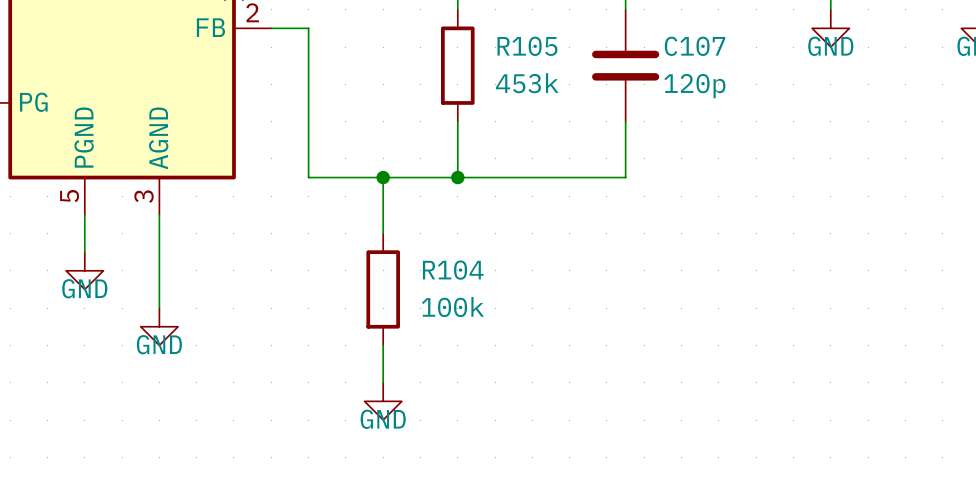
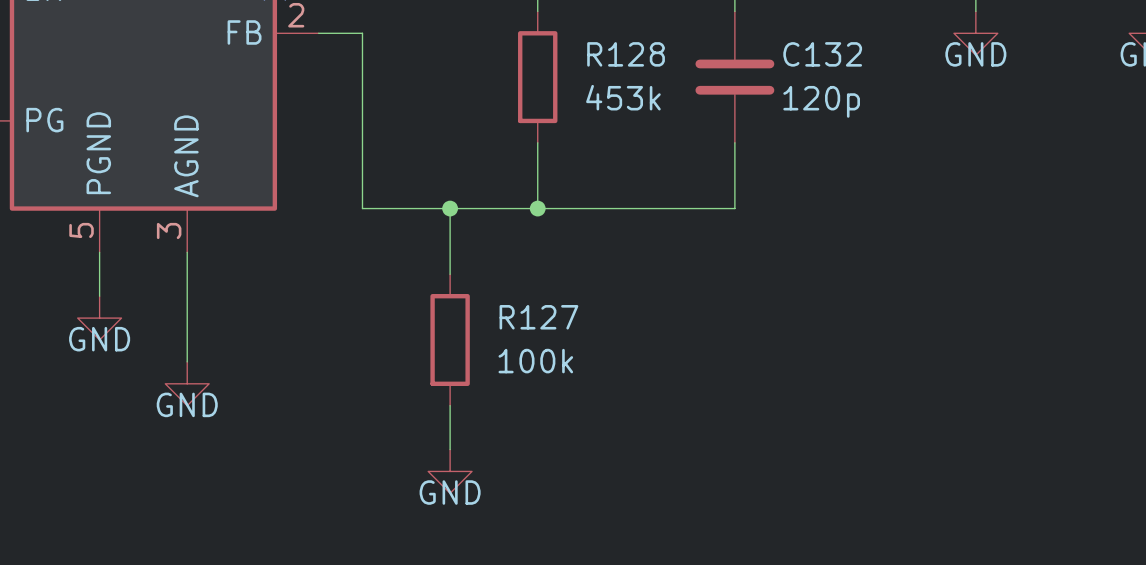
R105 name: R105 (527, 46) -> R128 (626, 54)
C107 name: C107 (695, 46) -> C132 (822, 54)
R104 name: R104 (453, 270) -> R127 (538, 317)

